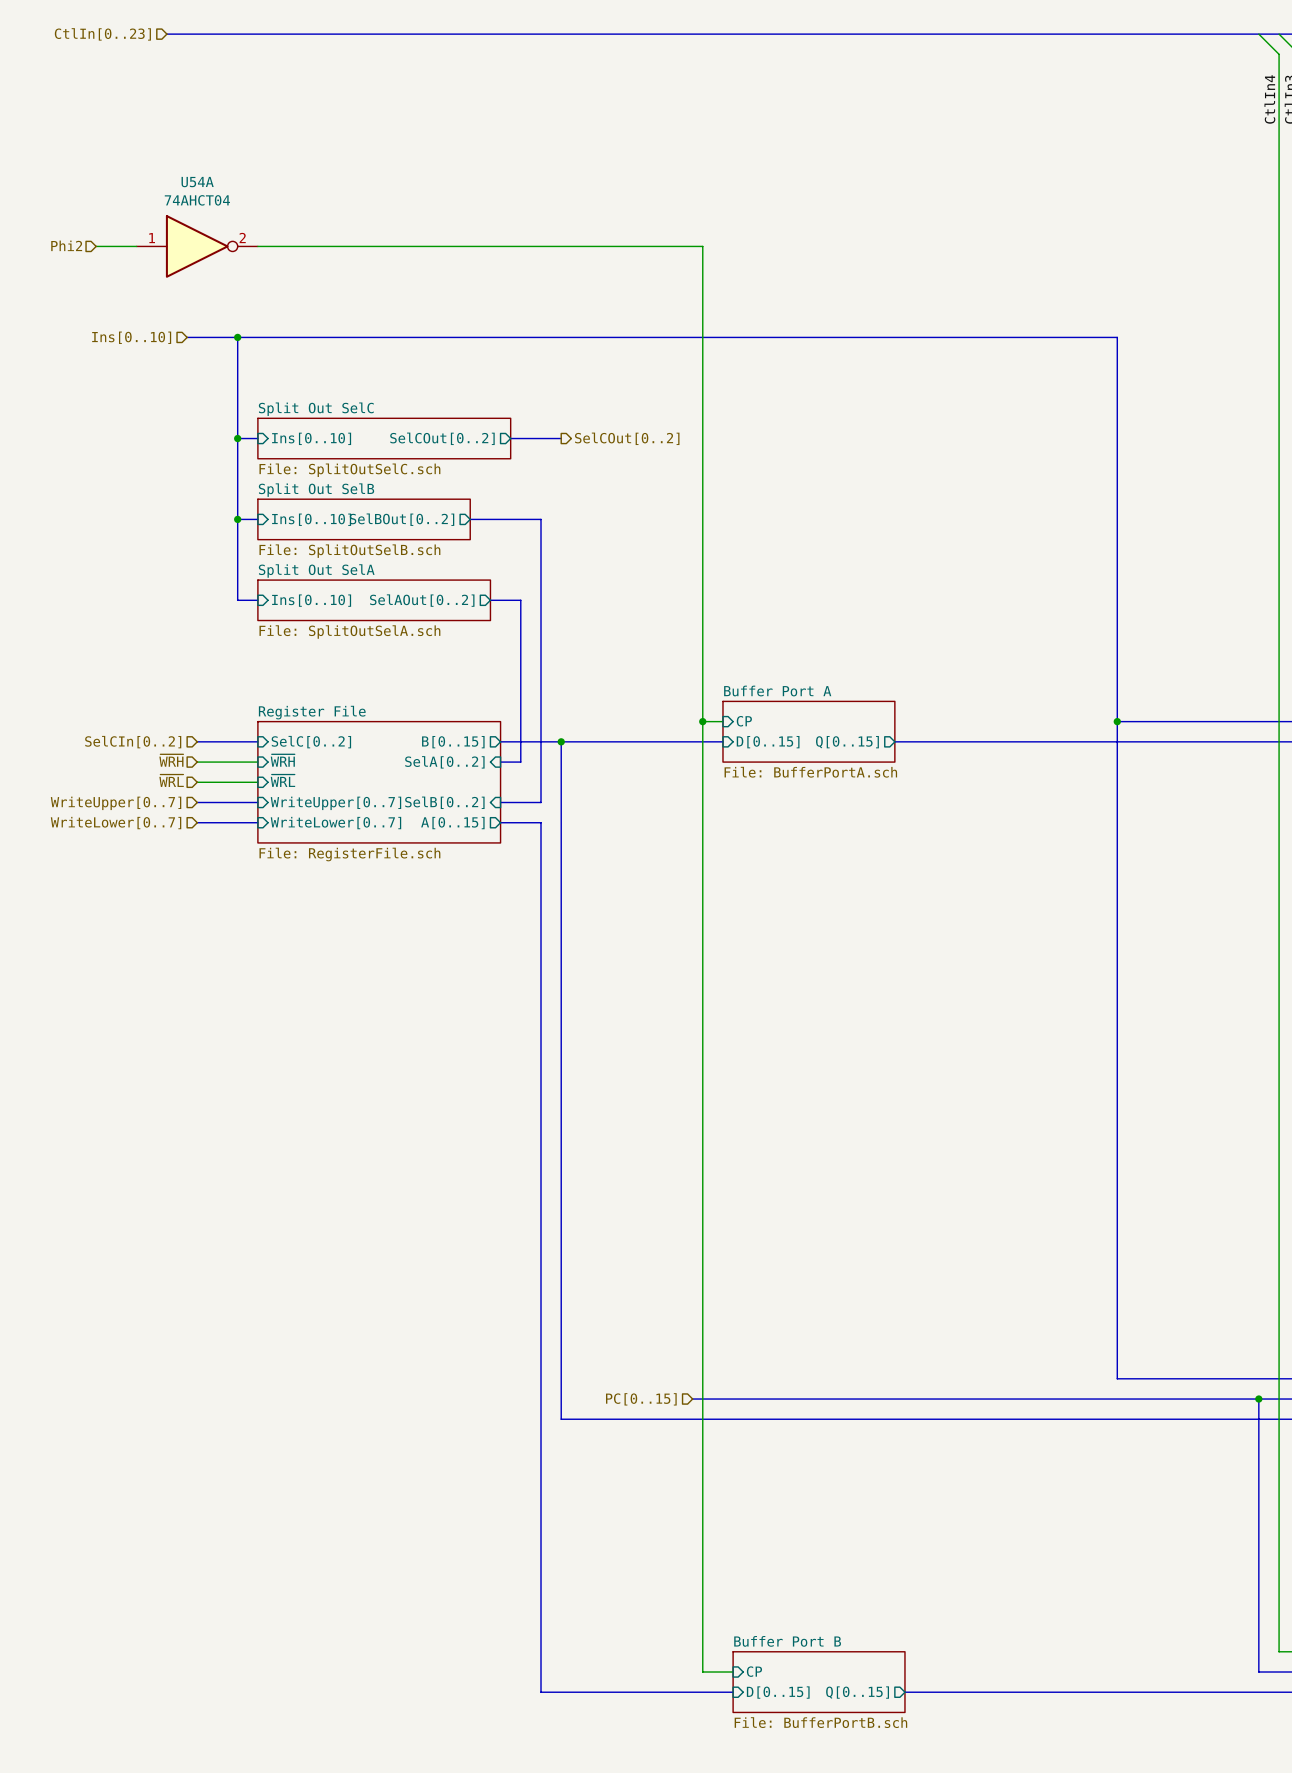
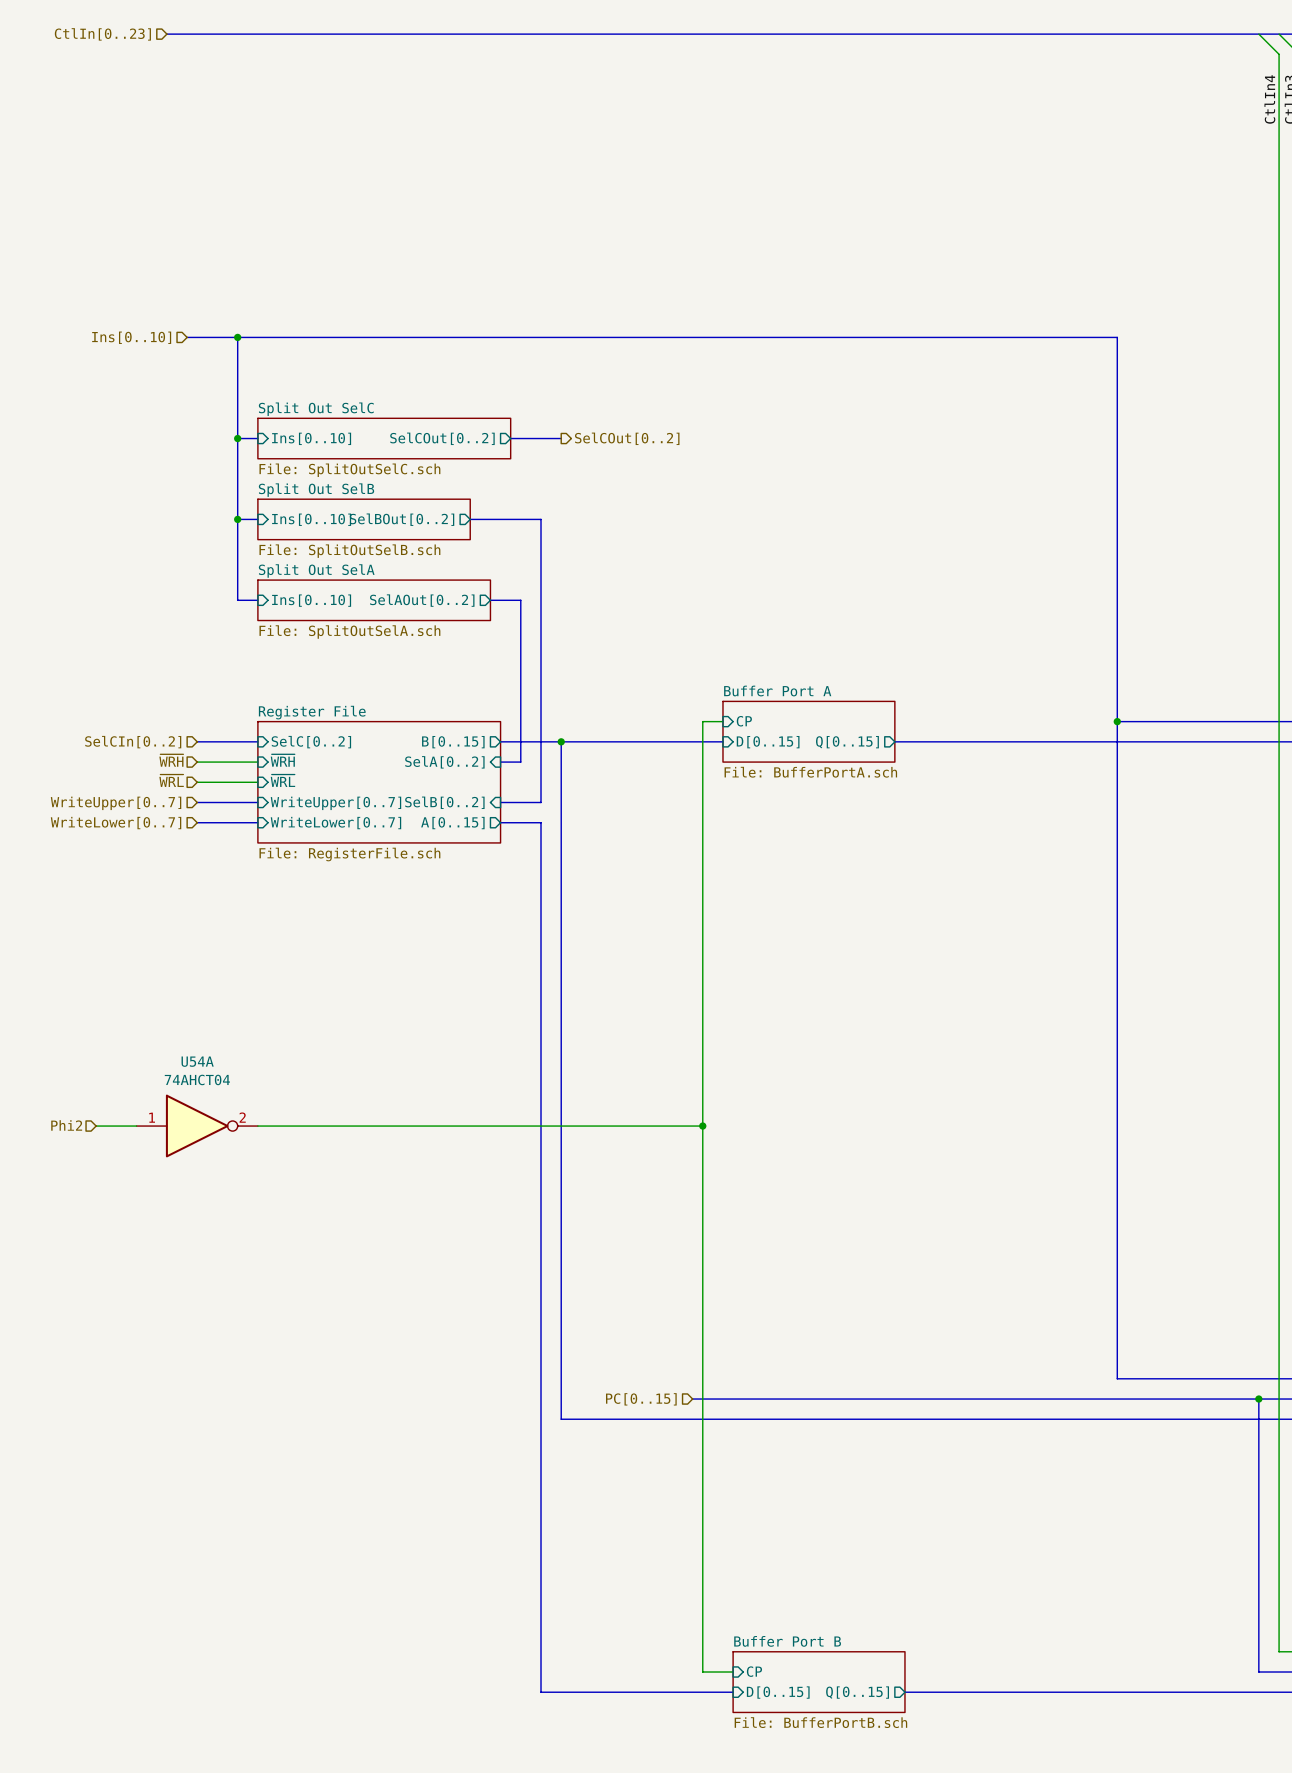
hierarchical label: Phi2 (66, 245) -> none
wire: (96, 246) (136, 246) -> none
U54A position: (197, 246) -> (197, 1126)
wire: (257, 246) (702, 246) (702, 721) -> none
junction: (702, 721) -> none
hierarchical label: none -> Phi2 (66, 1125)
wire: none -> (96, 1126) (136, 1126)
wire: none -> (257, 1126) (702, 1126)
junction: none -> (702, 1126)

